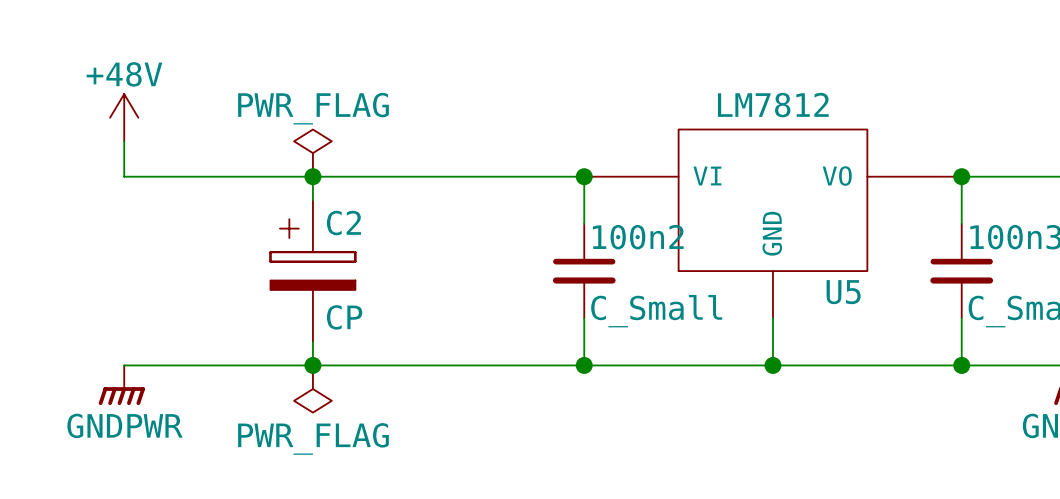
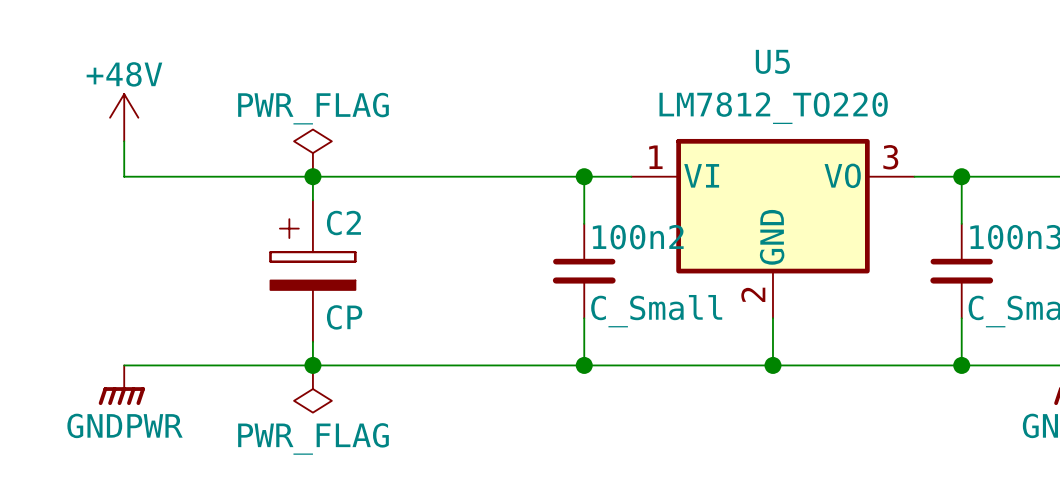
U5 value: LM7812 (773, 105) -> LM7812_TO220 (773, 108)
U5 symbol: [584, 129, 962, 319] -> [631, 138, 915, 319]
U5 name position: U5 (843, 292) -> U5 (772, 61)

